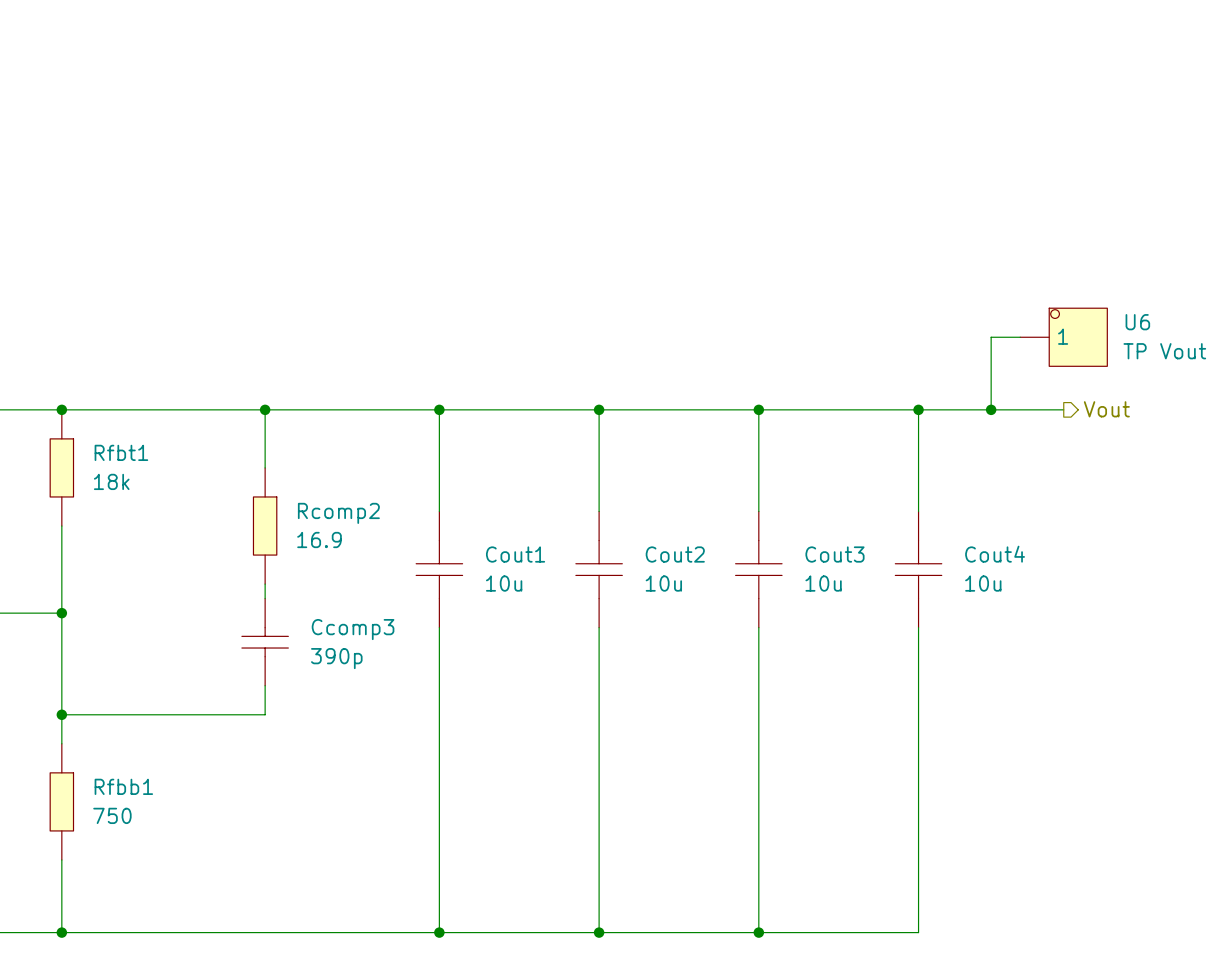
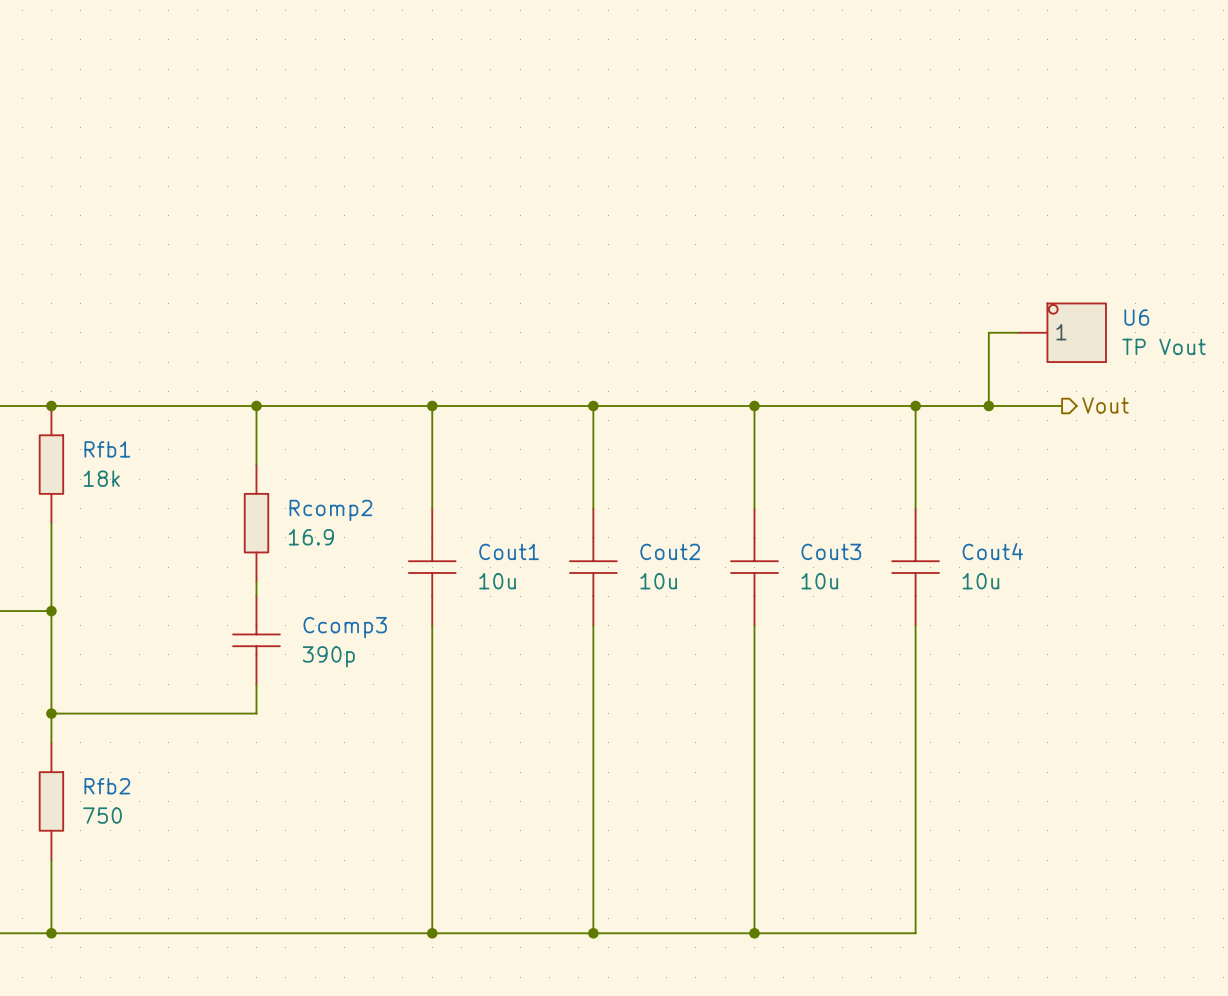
Rfbt1 name: Rfbt1 (121, 452) -> Rfb1 (107, 449)
Rfbb1 name: Rfbb1 (123, 786) -> Rfb2 (107, 786)

